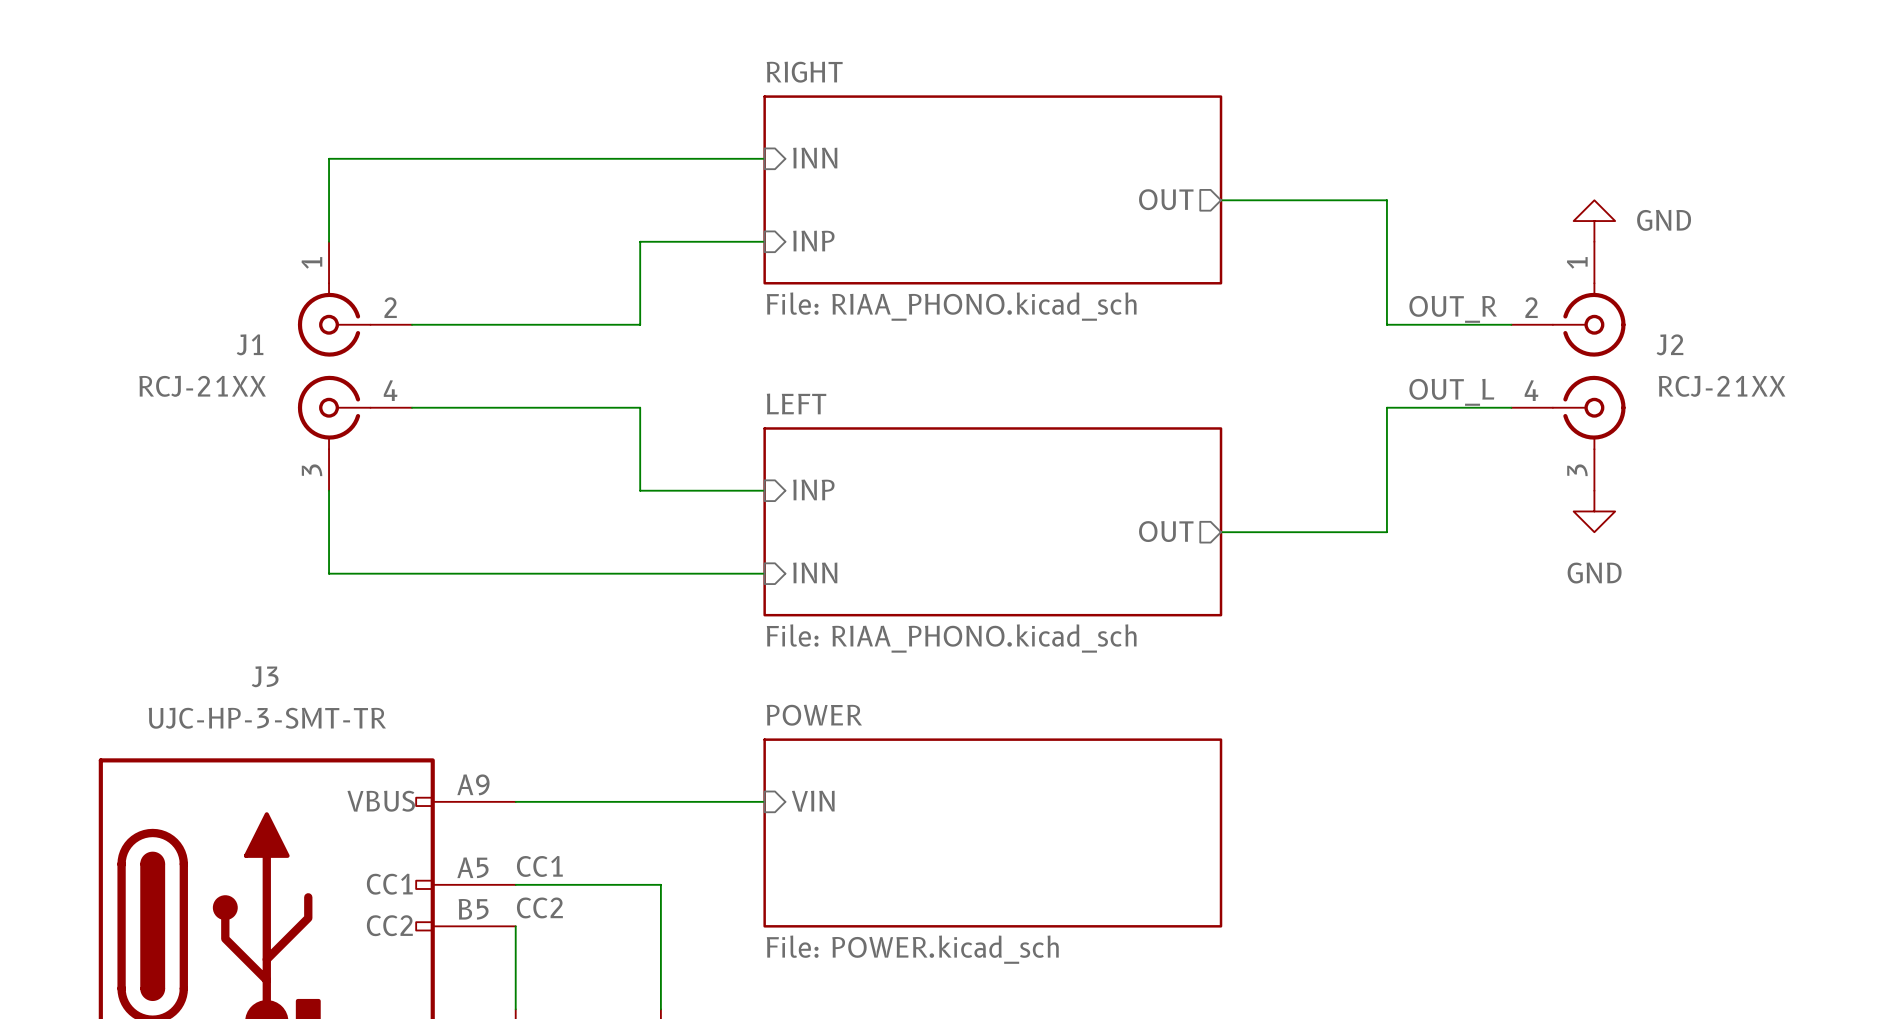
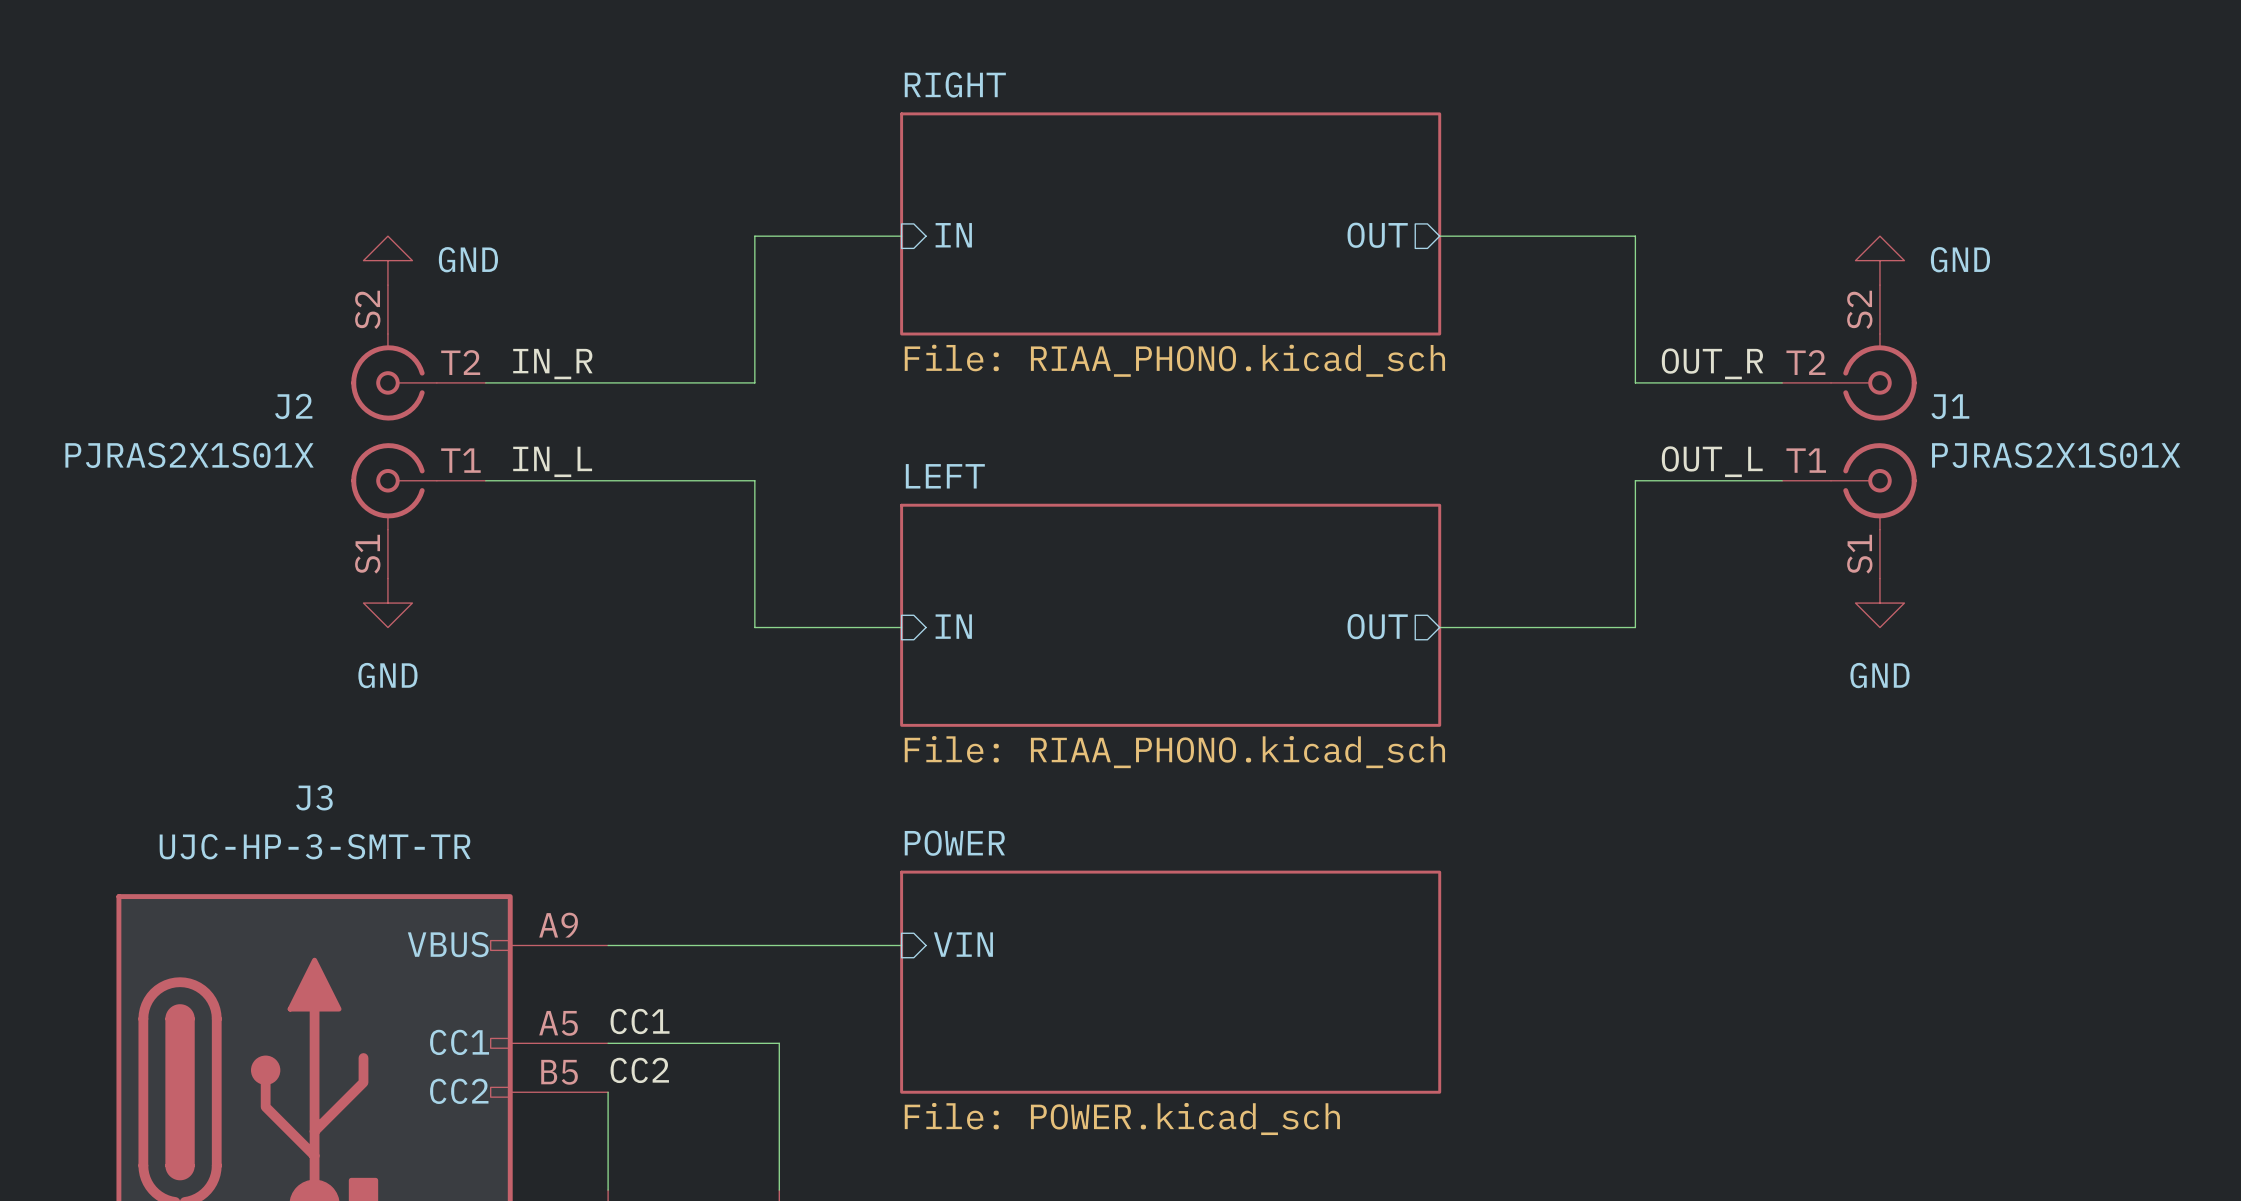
wire: (764, 158) (329, 158) (329, 241) -> none
sheet pin: INN (815, 158) -> none
sheet pin: none -> IN (953, 235)
power symbol: none -> GND (387, 260)
J1 symbol: [297, 241, 413, 491] -> [1782, 285, 1917, 579]
wire: (640, 241) (764, 241) -> (754, 285) (754, 236) (901, 236)
sheet pin: INP (813, 241) -> none
J2 symbol: [1511, 241, 1626, 491] -> [351, 285, 486, 579]
label: none -> IN_R (552, 364)
J1 name position: J1 (250, 344) -> J1 (1950, 406)
J2 name position: J2 (1669, 344) -> J2 (293, 406)
J1 value: RCJ-21XX (202, 386) -> PJRAS2X1S01X (2056, 455)
J2 value: RCJ-21XX (1722, 386) -> PJRAS2X1S01X (189, 455)
label: none -> IN_L (552, 461)
sheet pin: INP (813, 489) -> none
wire: (329, 490) (329, 573) (764, 573) -> none
wire: (640, 490) (764, 490) -> (754, 578) (754, 627) (901, 627)
power symbol: none -> GND (387, 603)
sheet pin: none -> IN (953, 626)
sheet pin: INN (815, 572) -> none

